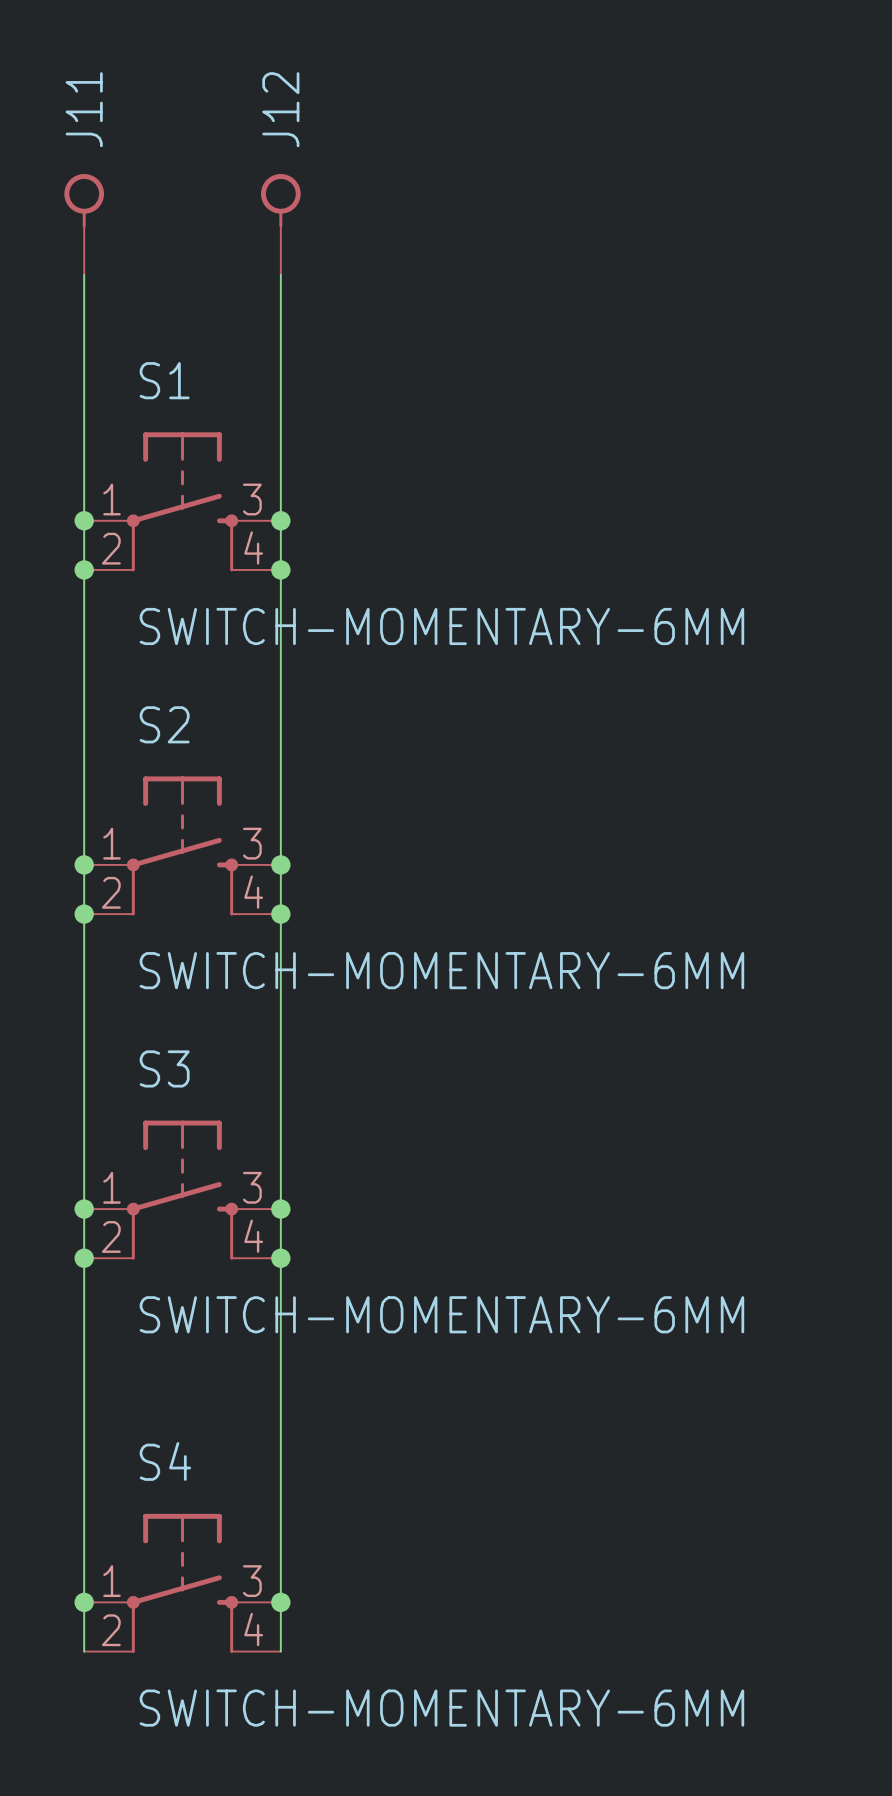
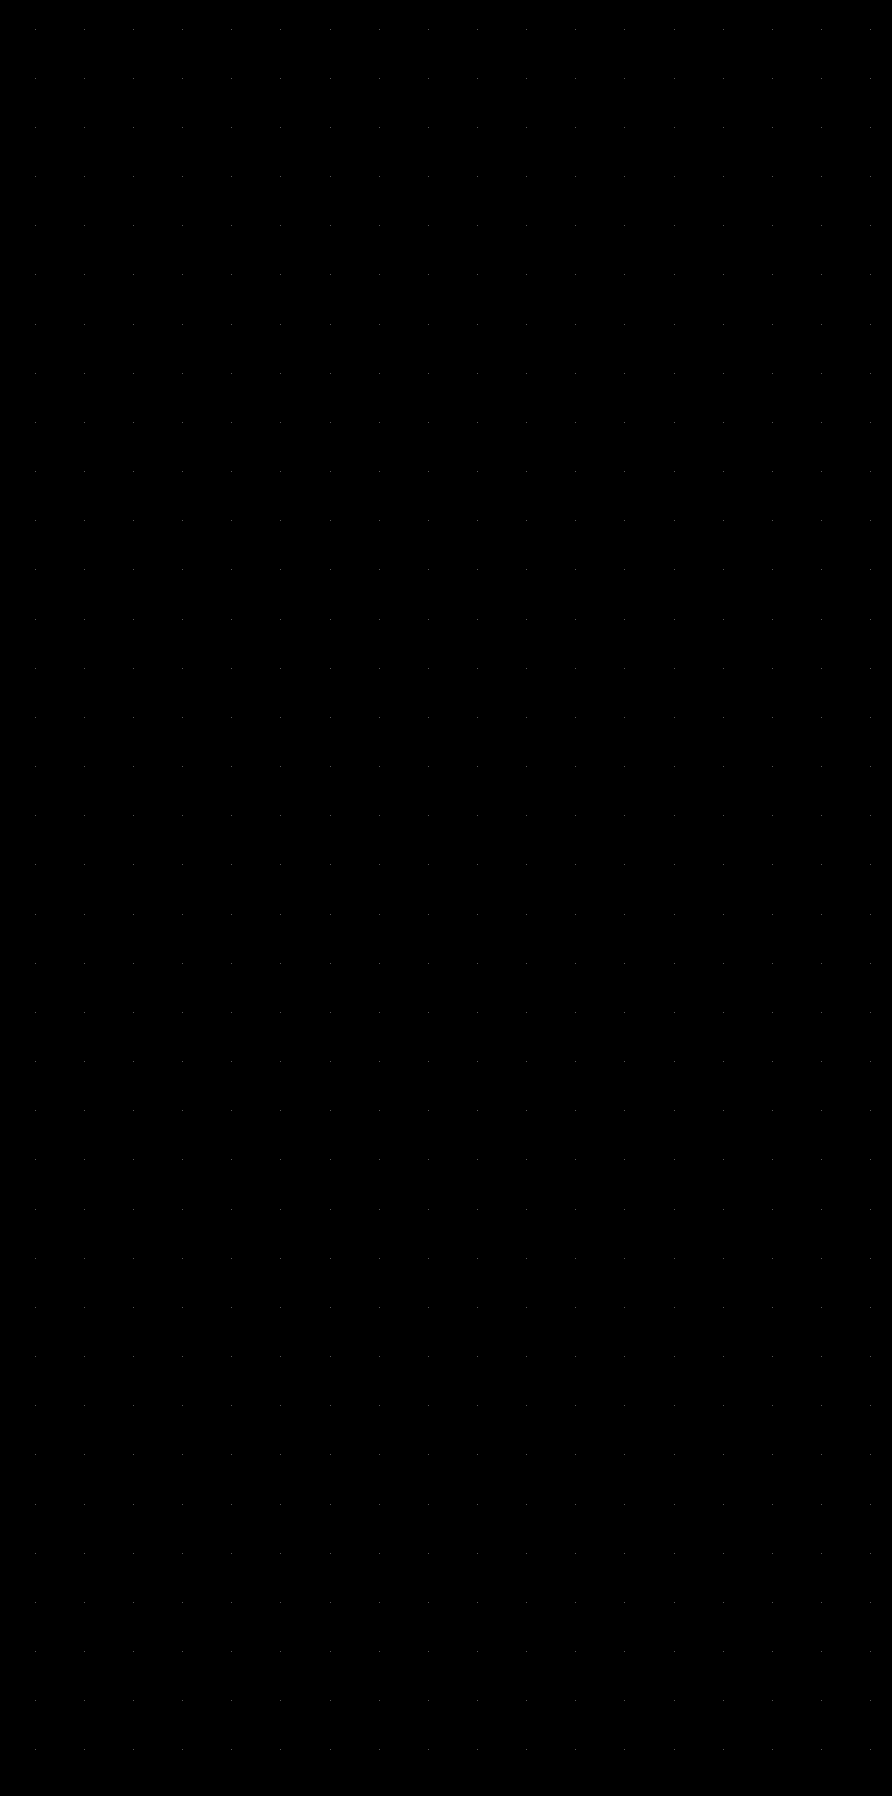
J11: (84, 224) -> none
J12: (280, 224) -> none
wire: (84, 274) (84, 1651) -> none
wire: (280, 274) (280, 1651) -> none
S1: SWITCH-MOMENTARY-6MM (182, 501) -> none
junction: (84, 520) -> none
junction: (280, 520) -> none
junction: (84, 569) -> none
junction: (280, 569) -> none
S2: SWITCH-MOMENTARY-6MM (182, 846) -> none
junction: (84, 864) -> none
junction: (280, 864) -> none
junction: (84, 914) -> none
junction: (280, 914) -> none
S3: SWITCH-MOMENTARY-6MM (182, 1190) -> none
junction: (84, 1209) -> none
junction: (280, 1209) -> none
junction: (84, 1258) -> none
junction: (280, 1258) -> none
S4: SWITCH-MOMENTARY-6MM (182, 1583) -> none
junction: (84, 1602) -> none
junction: (280, 1602) -> none

